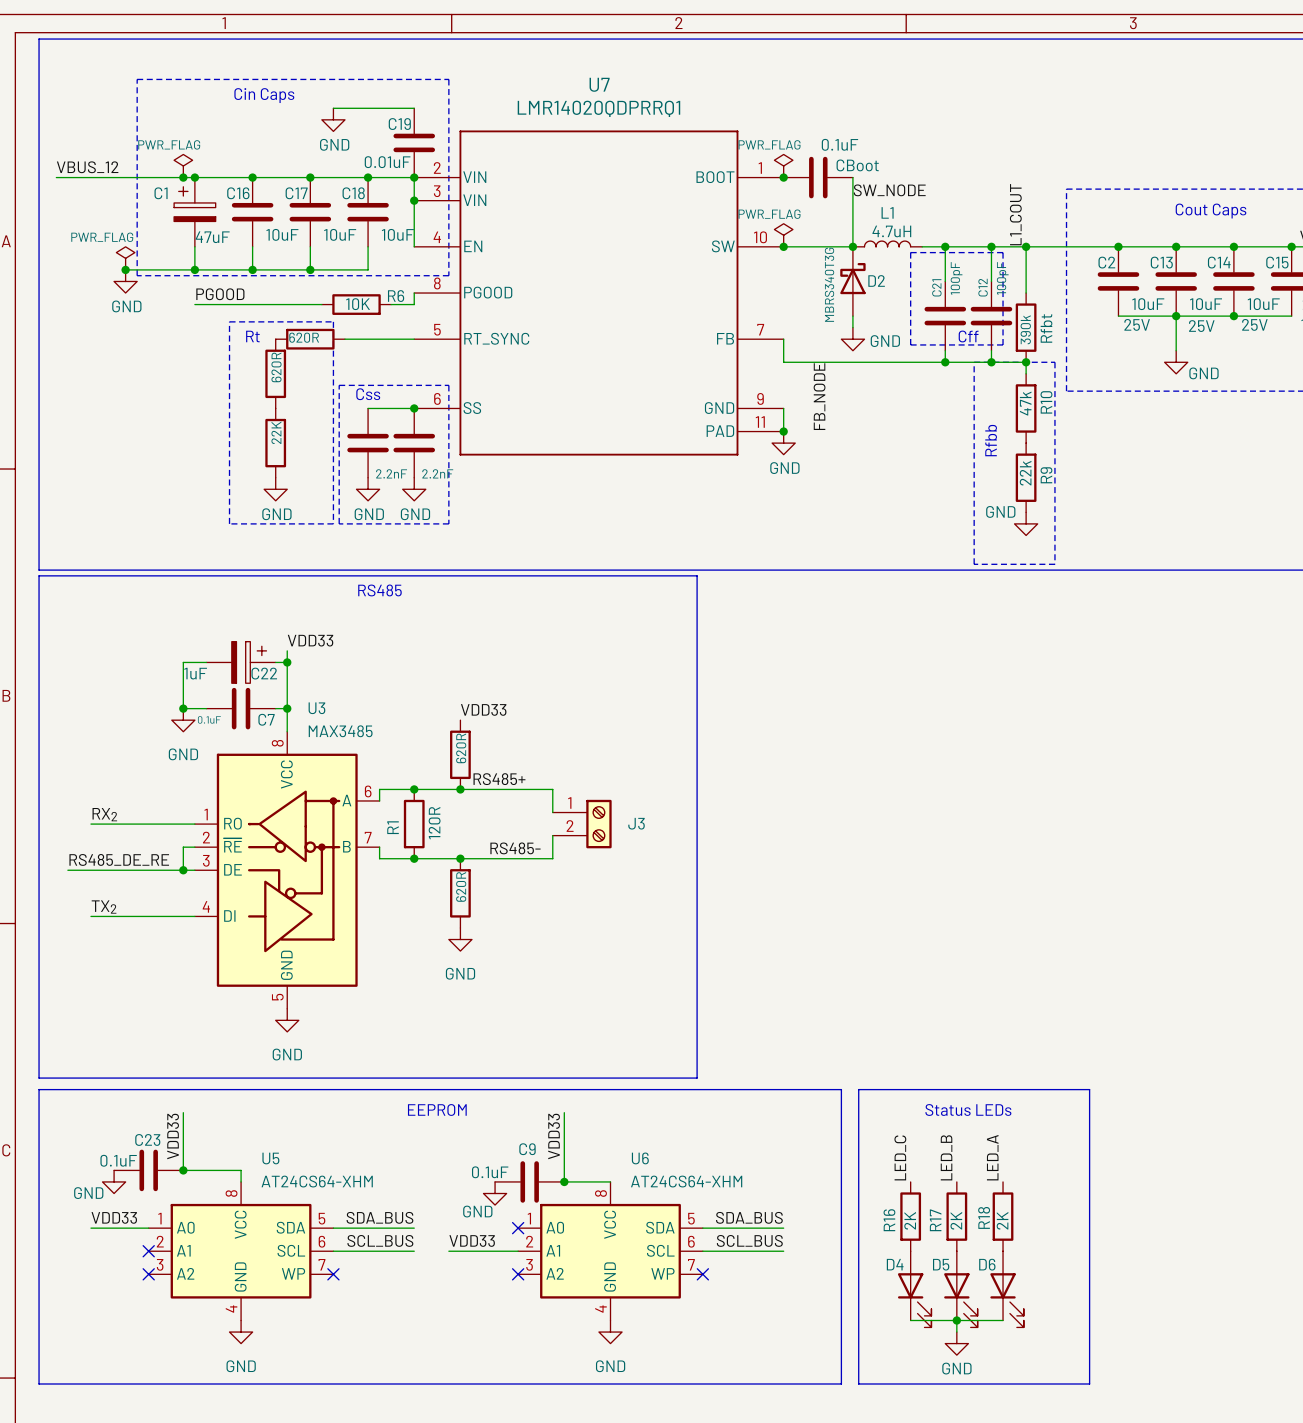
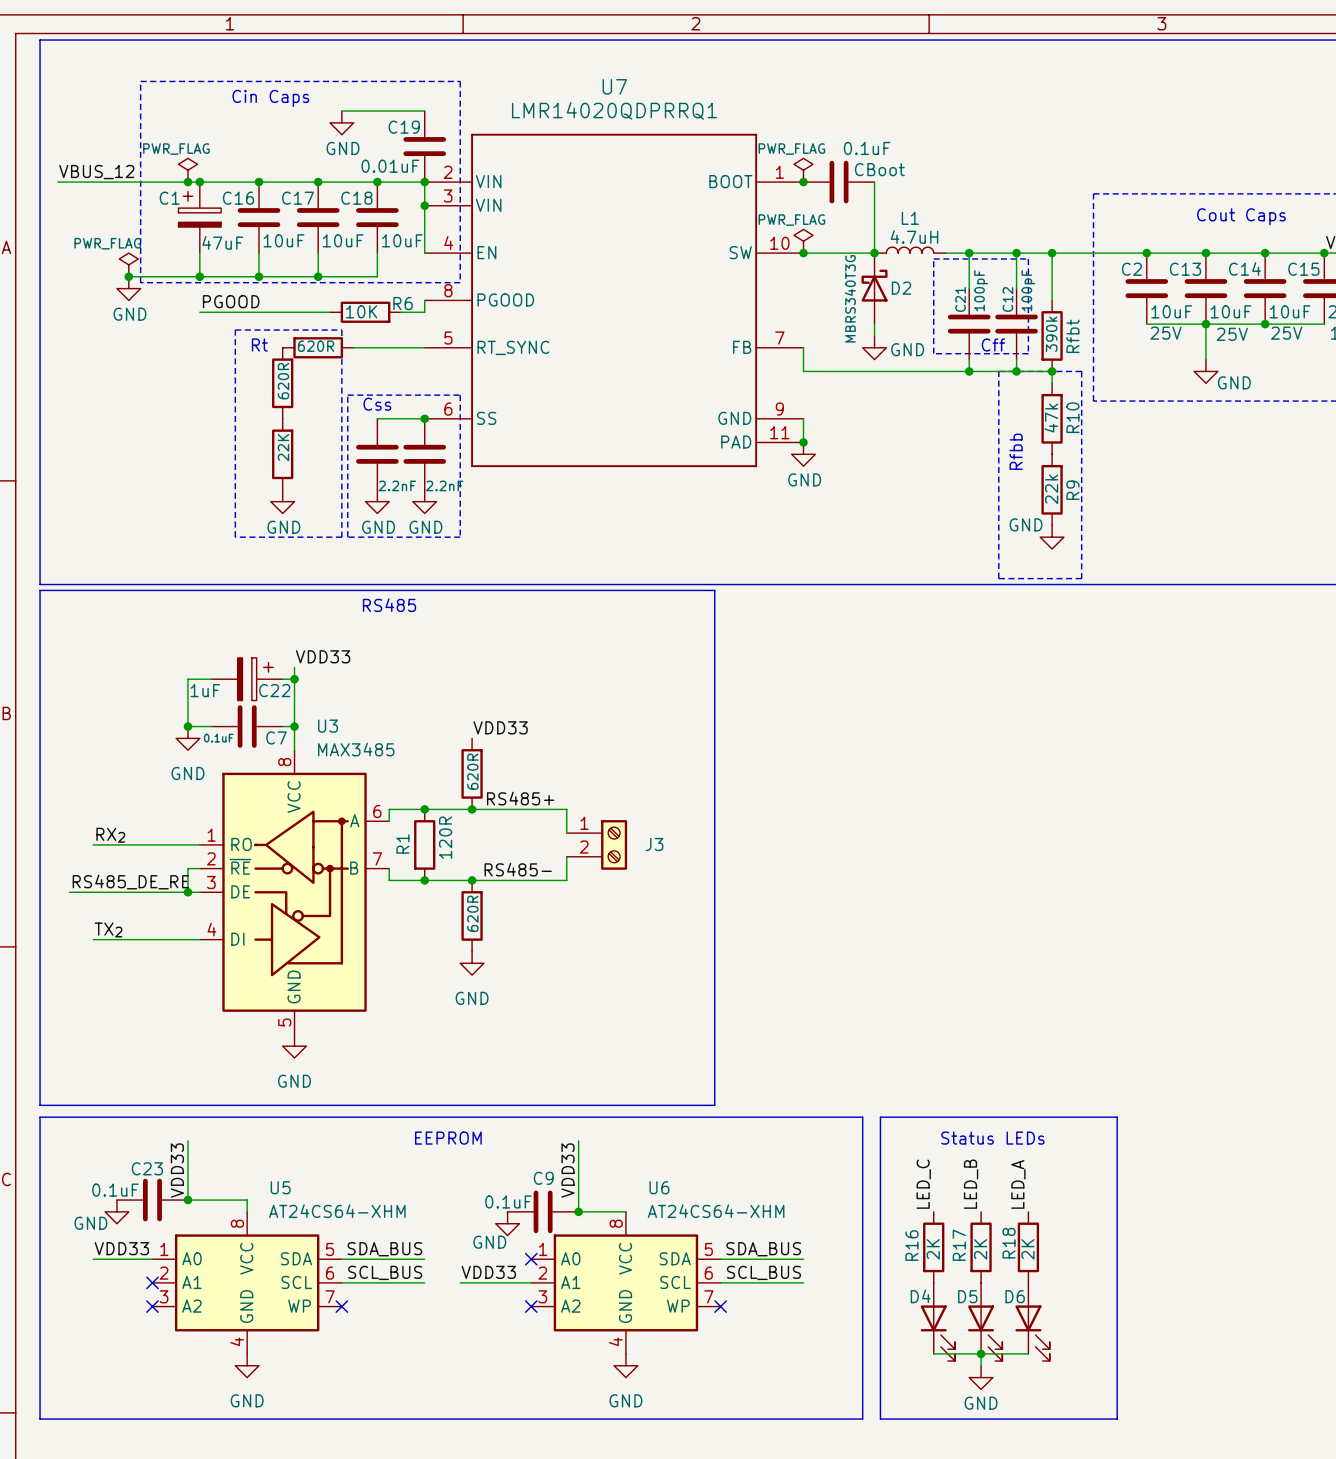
label: SW_NODE (889, 190) -> none
label: L1_COUT (1015, 214) -> none
label: FB_NODE (819, 396) -> none

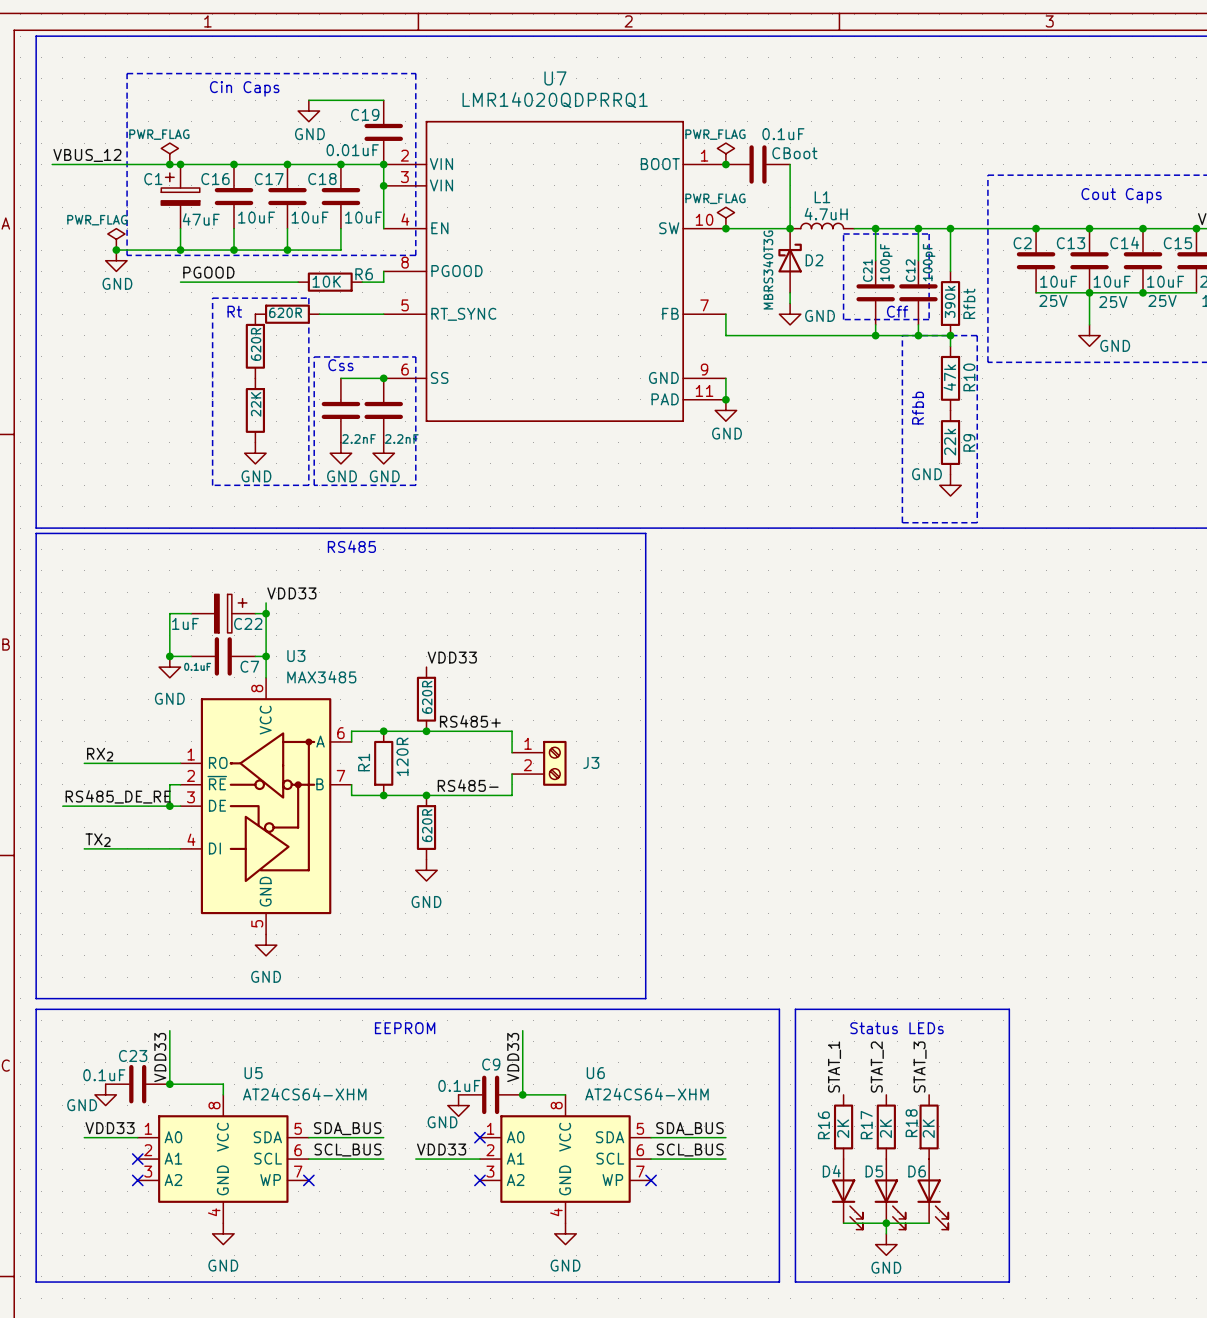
label: LED_C (923, 1184) -> STAT_1 (834, 1067)
label: LED_B (971, 1184) -> STAT_2 (877, 1067)
label: LED_A (1018, 1184) -> STAT_3 (920, 1067)

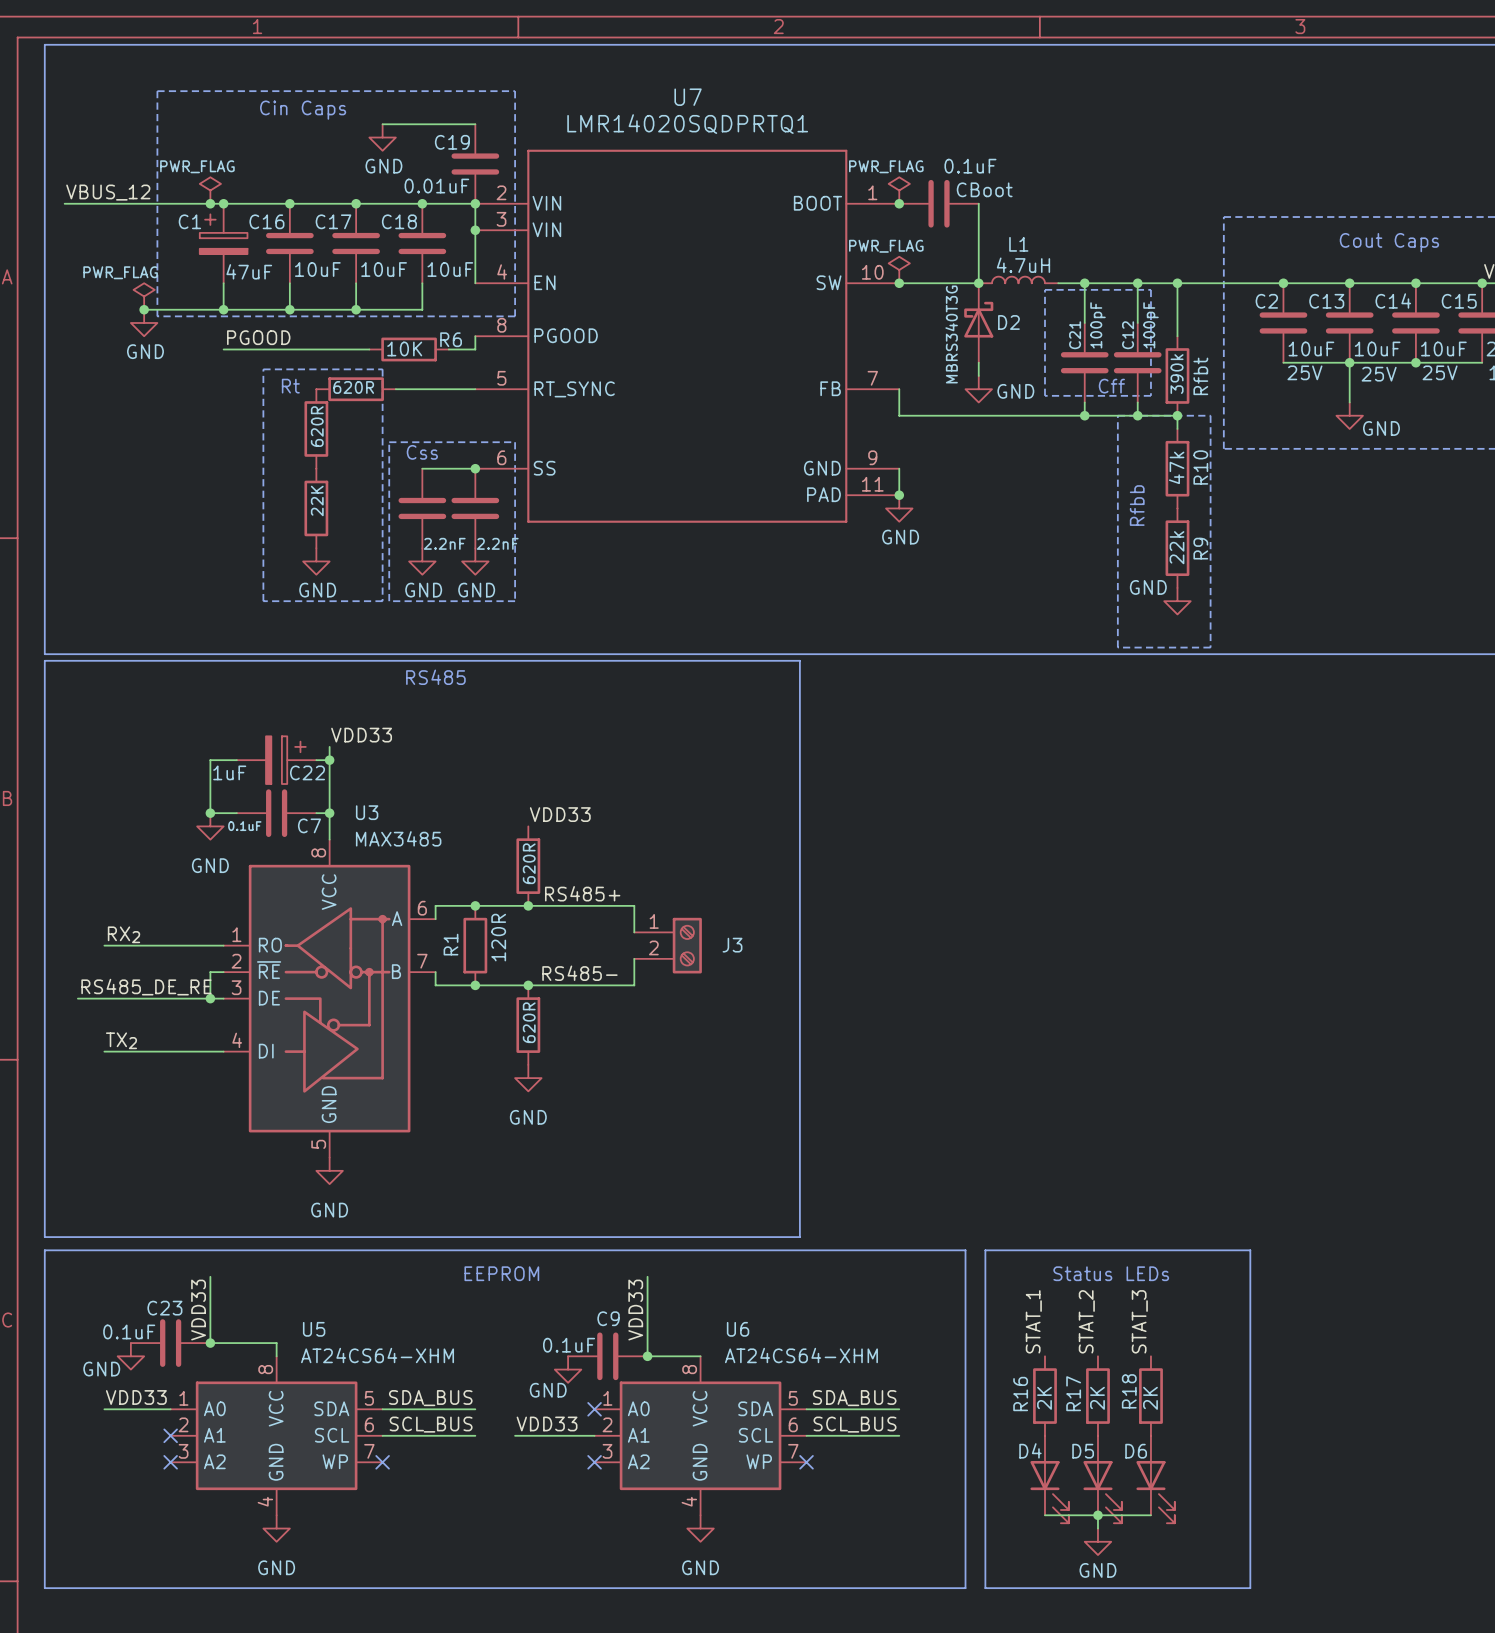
U7 value: LMR14020QDPRRQ1 (555, 100) -> LMR14020SQDPRTQ1 (687, 124)

